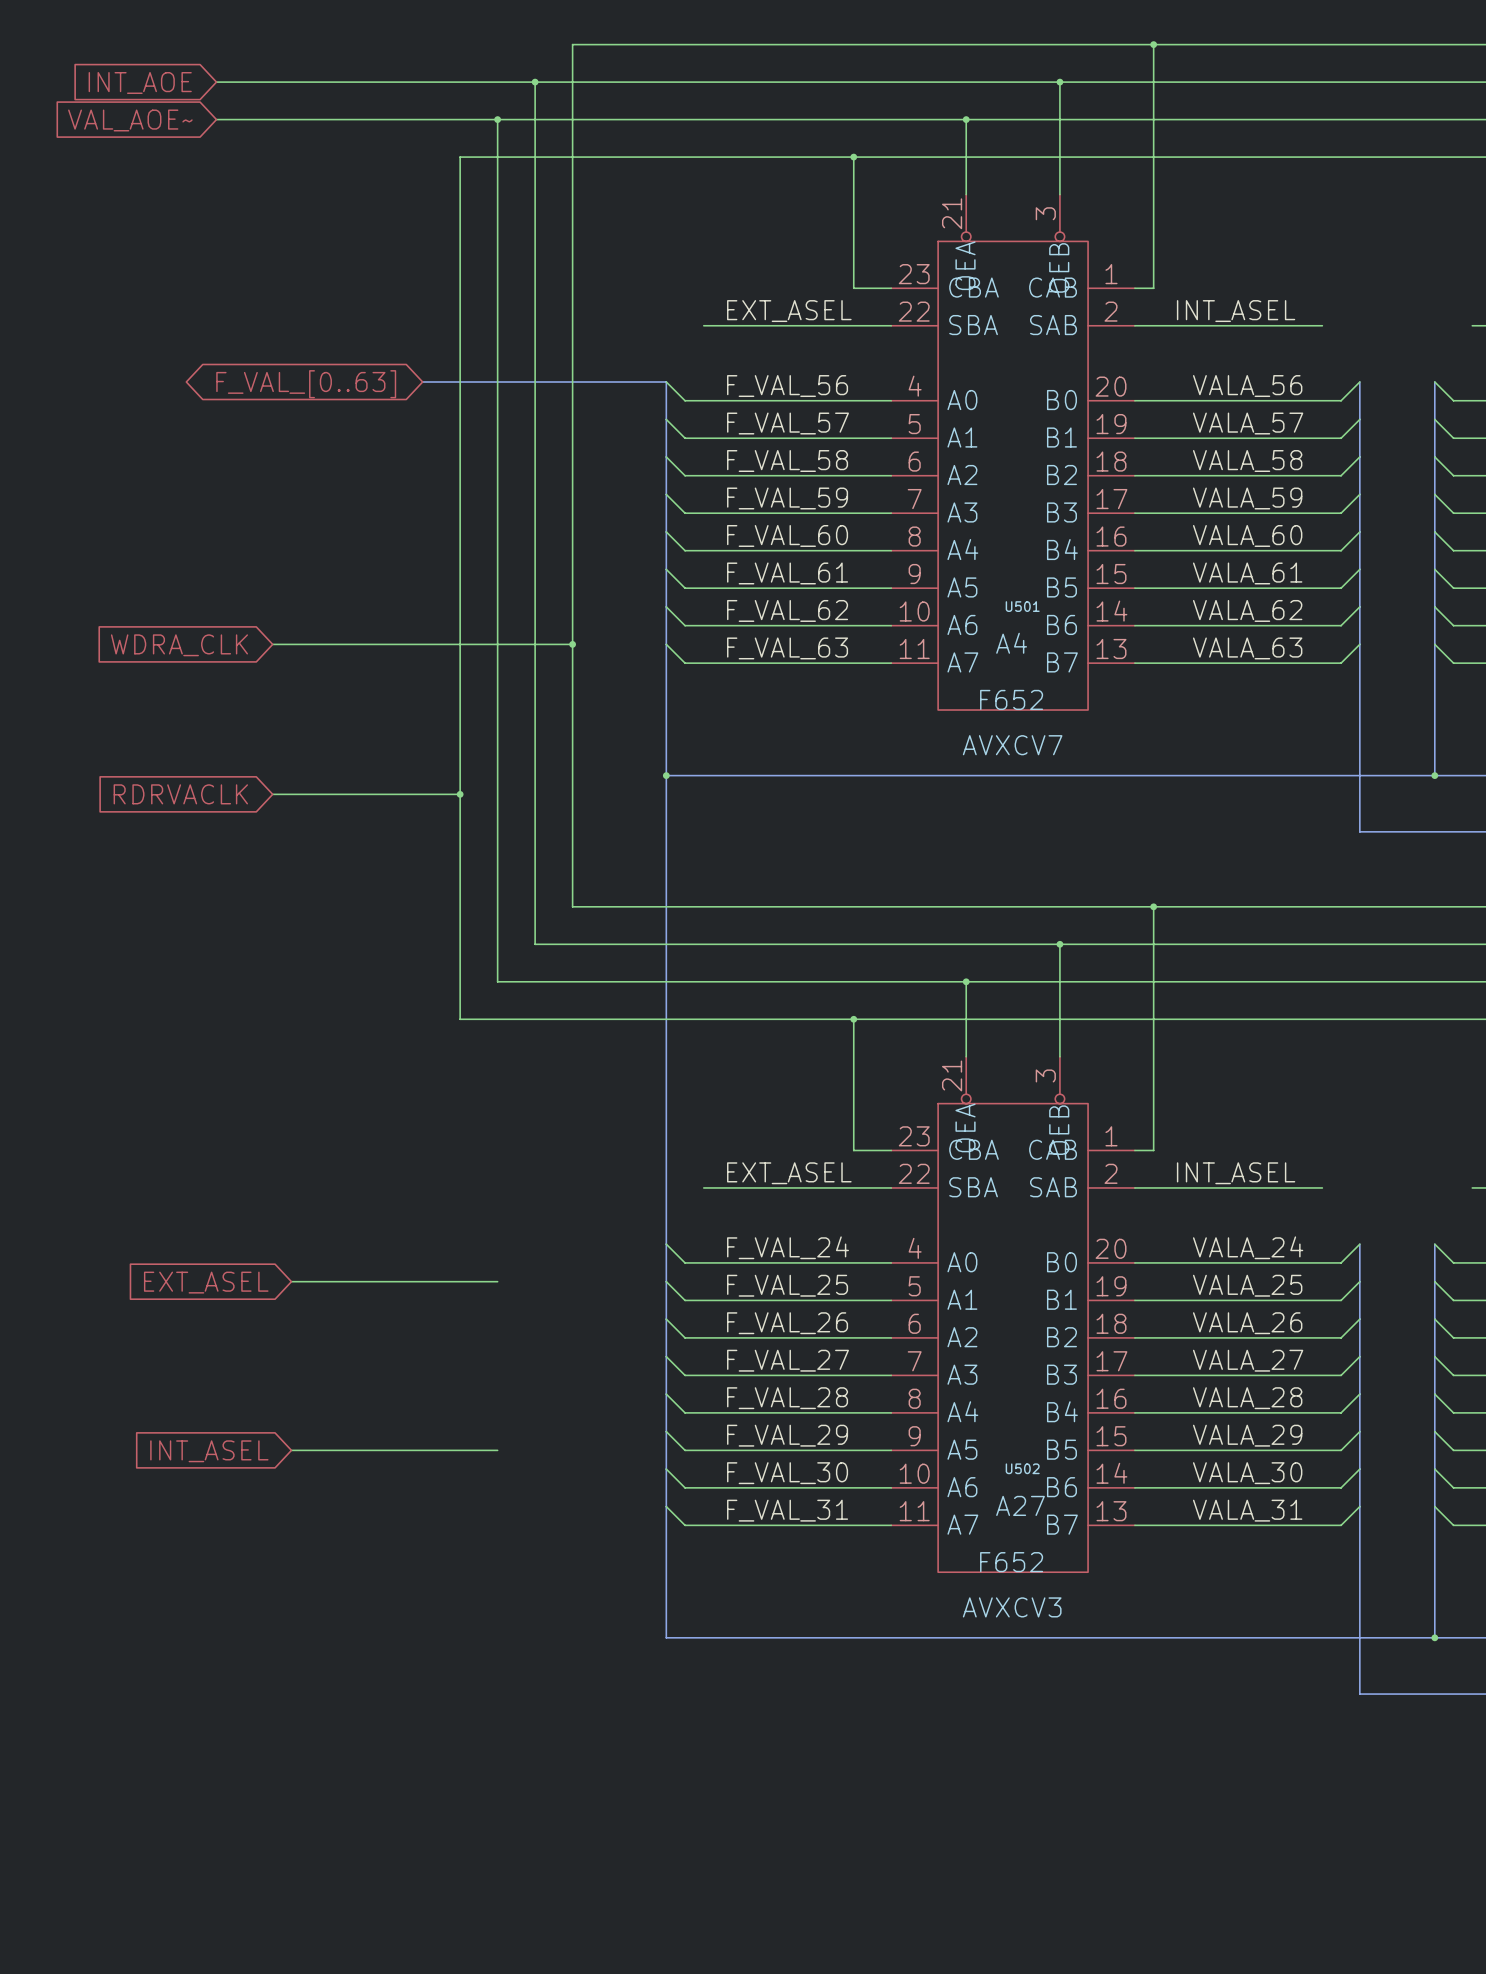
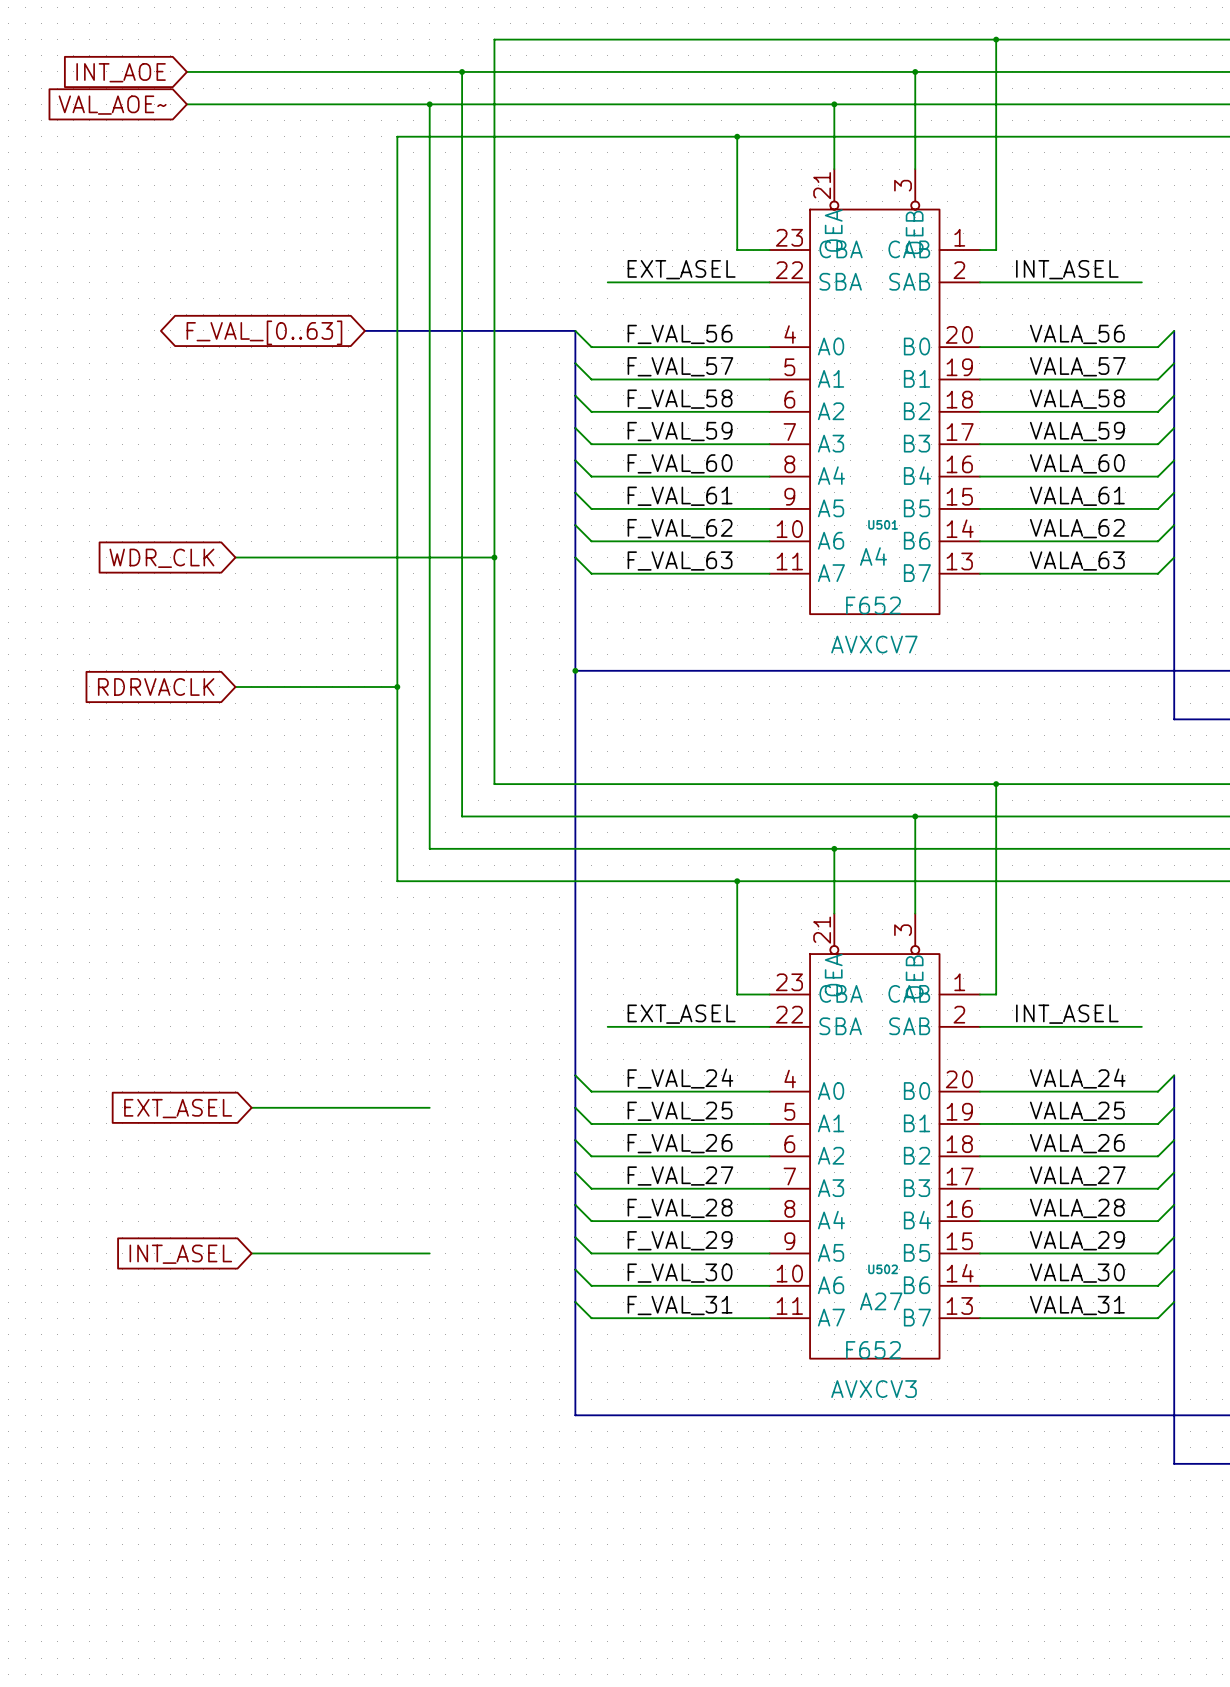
global label: WDRA_CLK (179, 645) -> WDR_CLK (161, 558)

